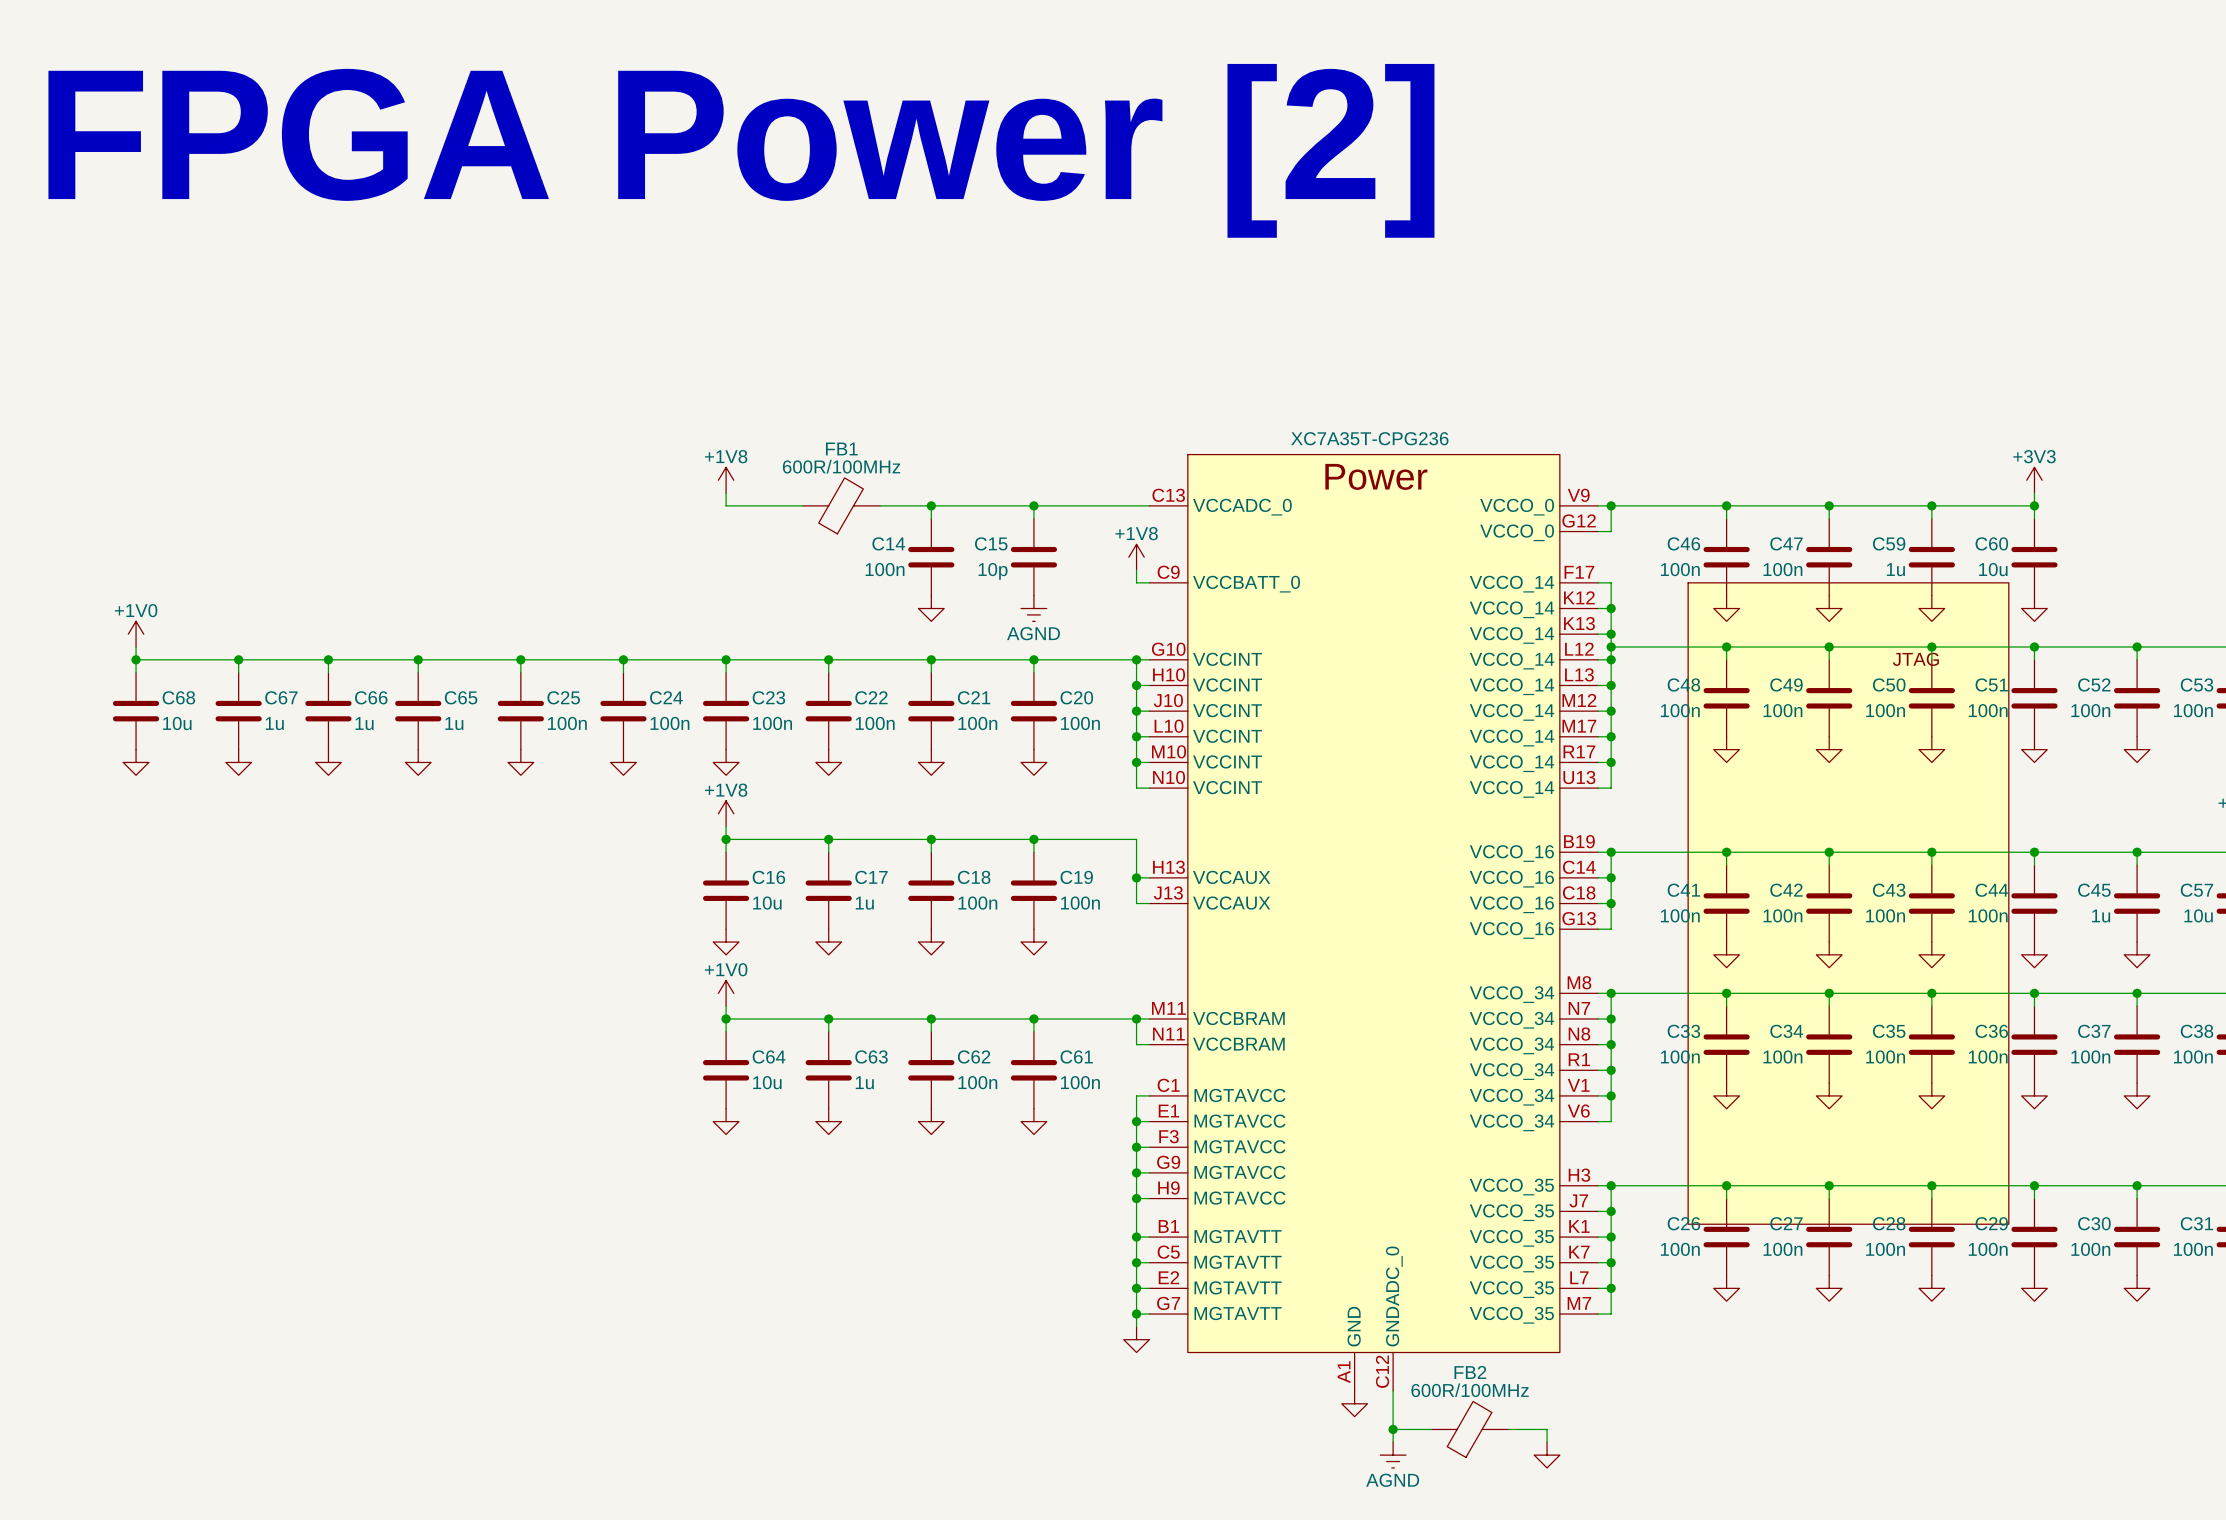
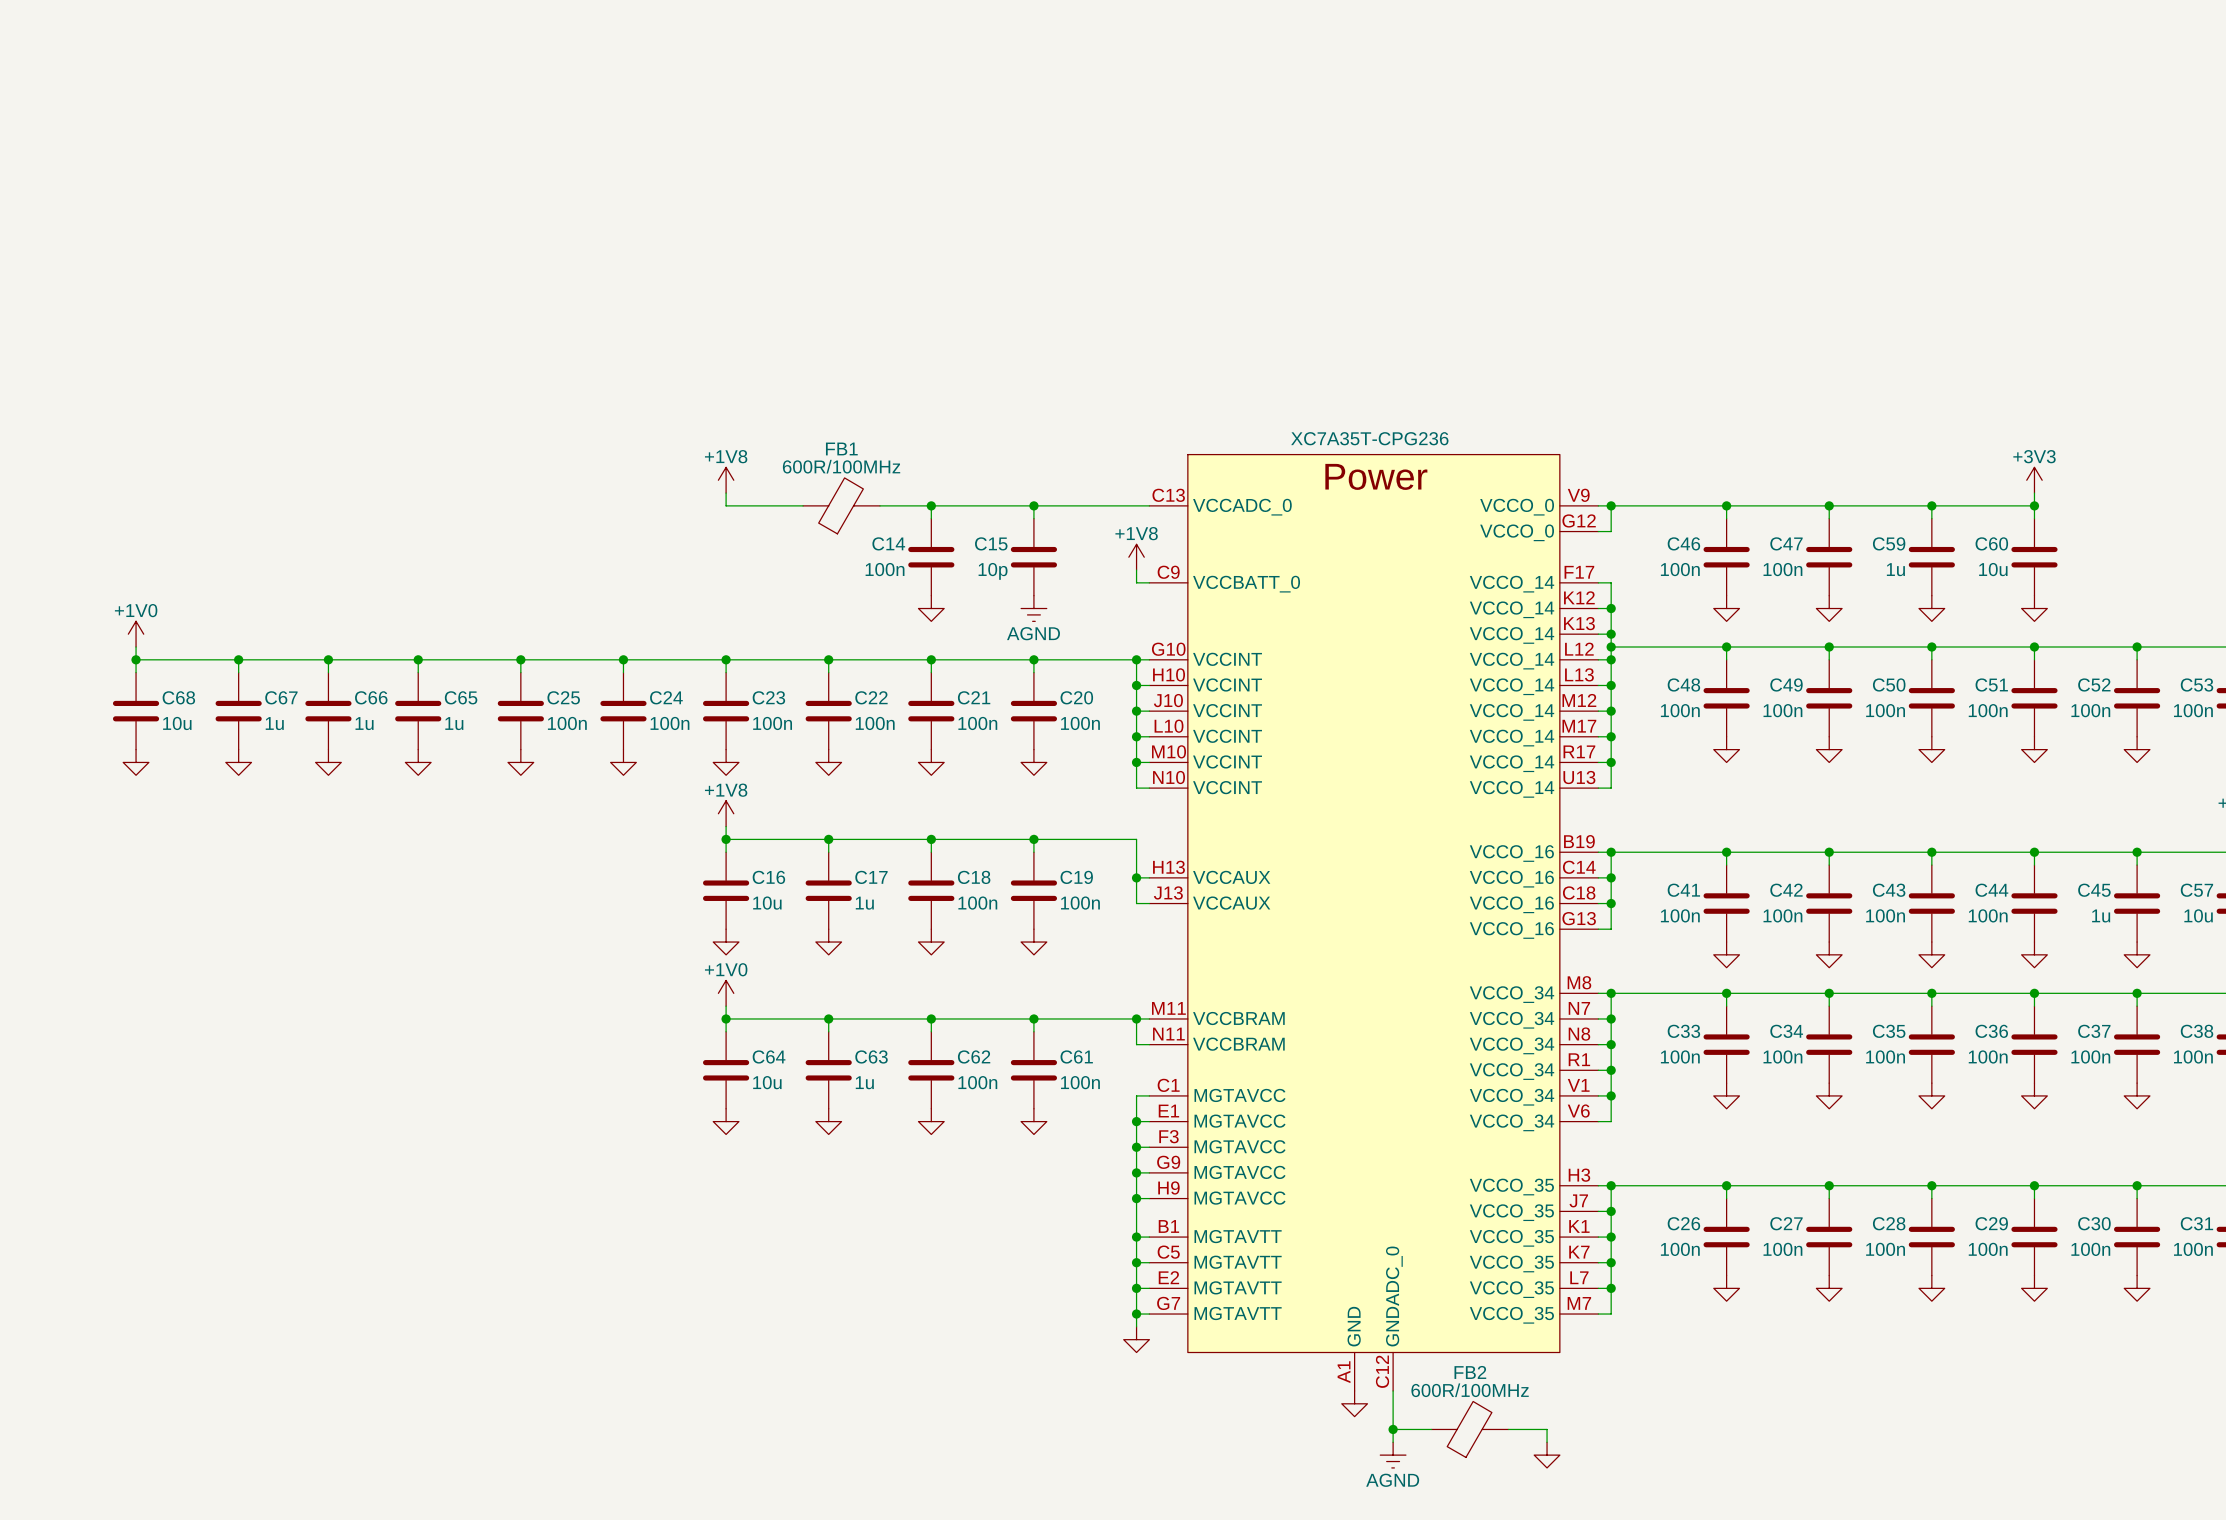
text: FPGA Power [2] (741, 150) -> none
part: XC7A35T-CPG236 (1579, 922) -> none

